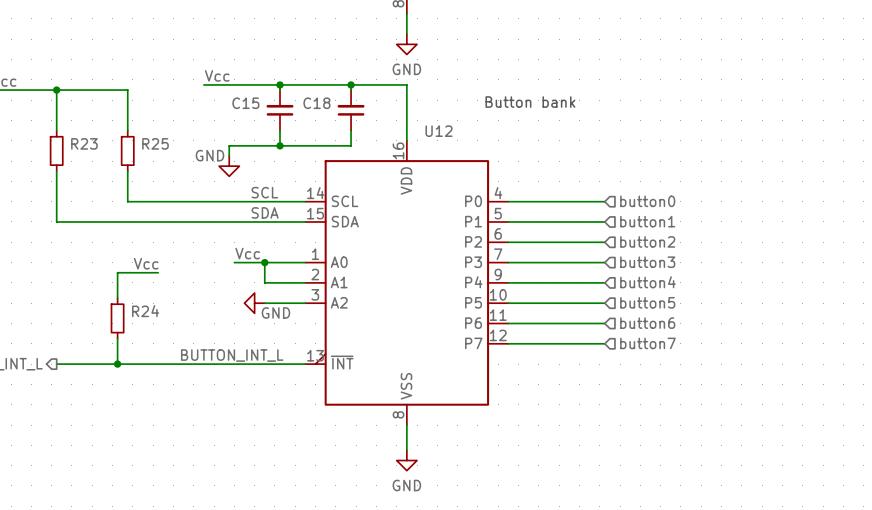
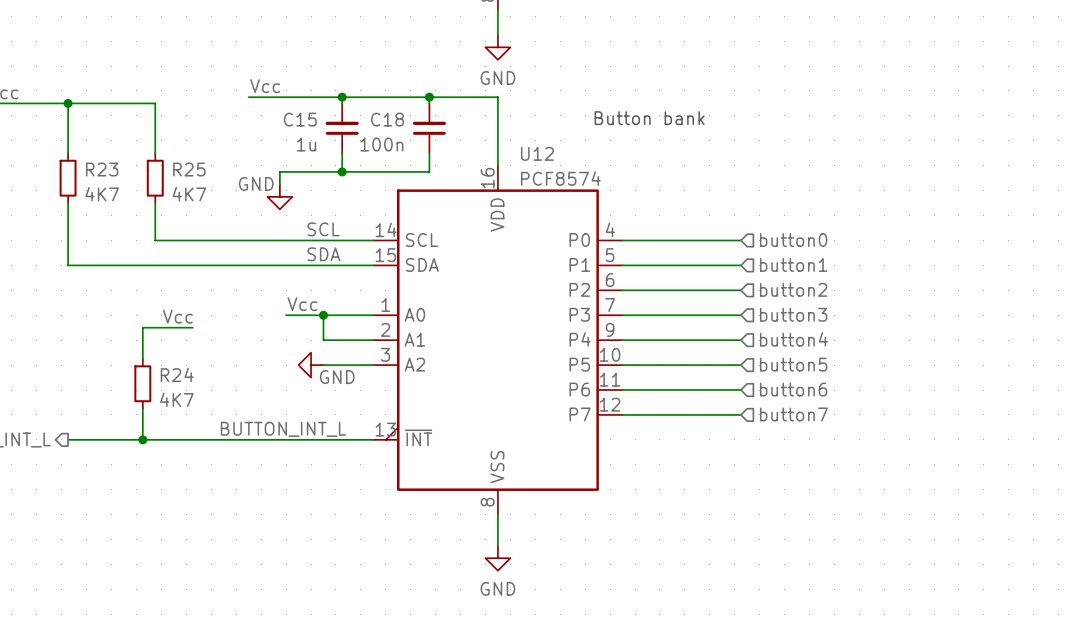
C15 value: none -> 1u (306, 144)
C18 value: none -> 100n (381, 144)
U12 value: none -> PCF8574 (560, 178)
R23 value: none -> 4K7 (102, 194)
R25 value: none -> 4K7 (189, 194)
R24 value: none -> 4K7 (176, 399)

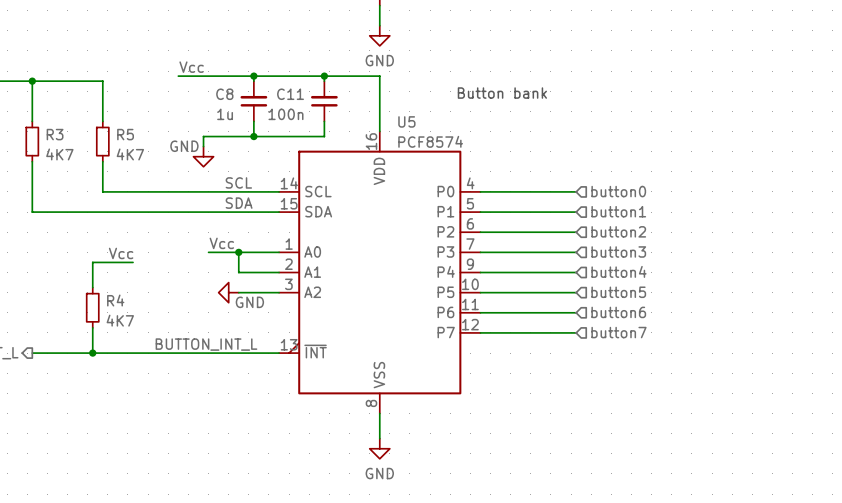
C15 name: C15 (300, 119) -> C8 (224, 94)
C18 name: C18 (387, 119) -> C11 (290, 94)
U12 name: U12 (537, 153) -> U5 (406, 121)
R23 name: R23 (102, 169) -> R3 (55, 134)
R25 name: R25 (189, 169) -> R5 (125, 134)
R24 name: R24 (177, 374) -> R4 (115, 300)

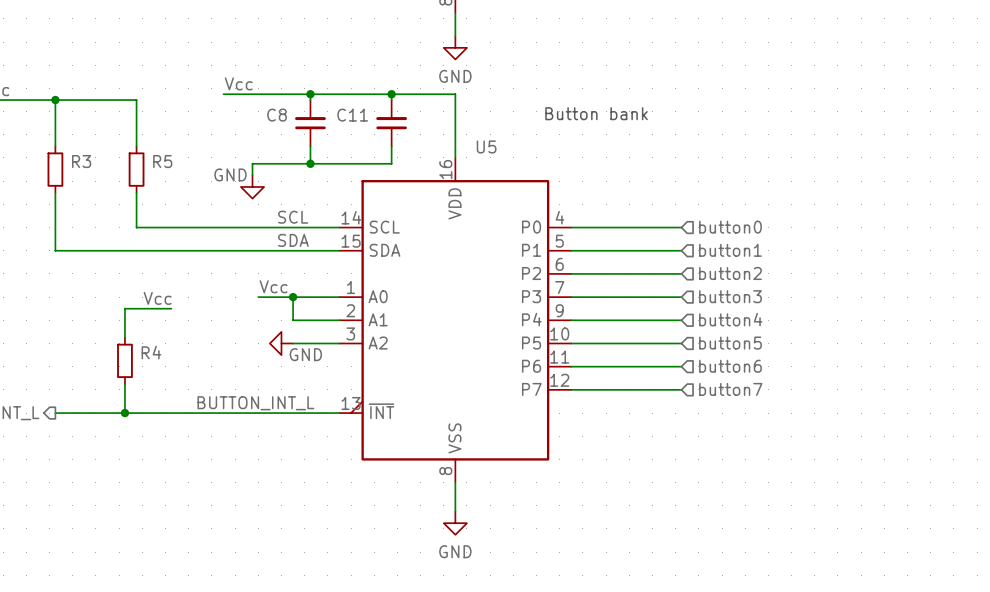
C8 value: 1u (225, 114) -> none
C11 value: 100n (285, 114) -> none
U5 value: PCF8574 (430, 141) -> none
R3 value: 4K7 (59, 154) -> none
R5 value: 4K7 (130, 154) -> none
R4 value: 4K7 (120, 320) -> none

